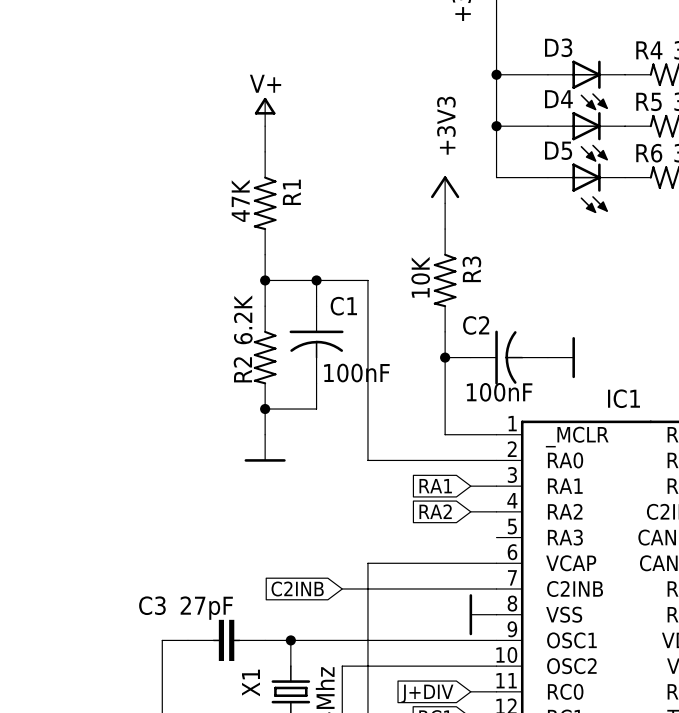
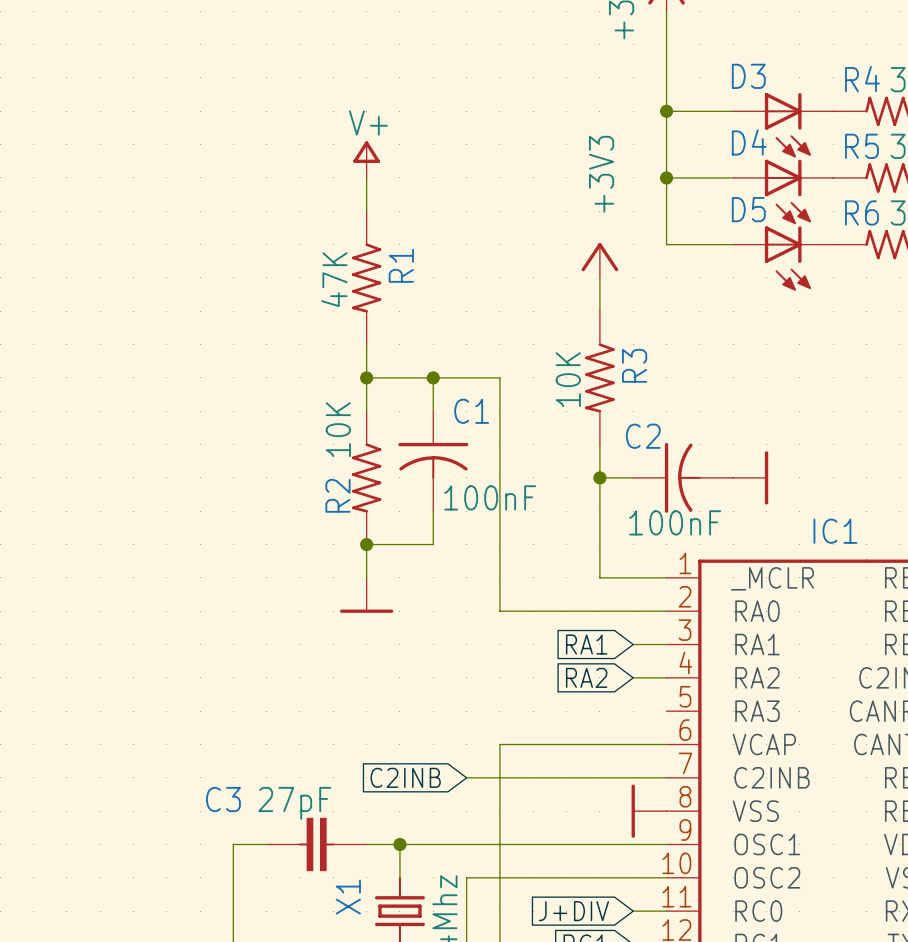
R2 value: 6.2K (243, 319) -> 10K (338, 429)

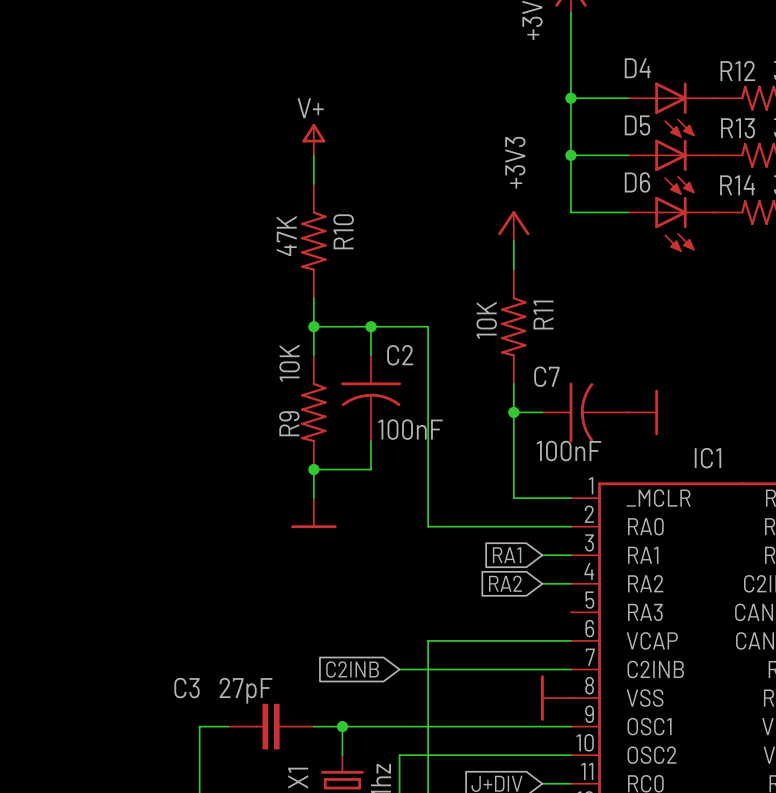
D3 name: D3 (748, 76) -> D4 (637, 68)
R4 name: R4 (862, 79) -> R12 (737, 70)
D4 name: D4 (749, 142) -> D5 (637, 125)
R5 name: R5 (861, 146) -> R13 (738, 128)
D5 name: D5 (748, 209) -> D6 (637, 182)
R6 name: R6 (861, 212) -> R14 (737, 185)
R1 name: R1 (401, 265) -> R10 (343, 231)
R3 name: R3 (634, 365) -> R11 (543, 315)
C1 name: C1 (471, 411) -> C2 (400, 355)
C2 name: C2 (643, 436) -> C7 (546, 376)
R2 name: R2 (337, 495) -> R9 (289, 423)

